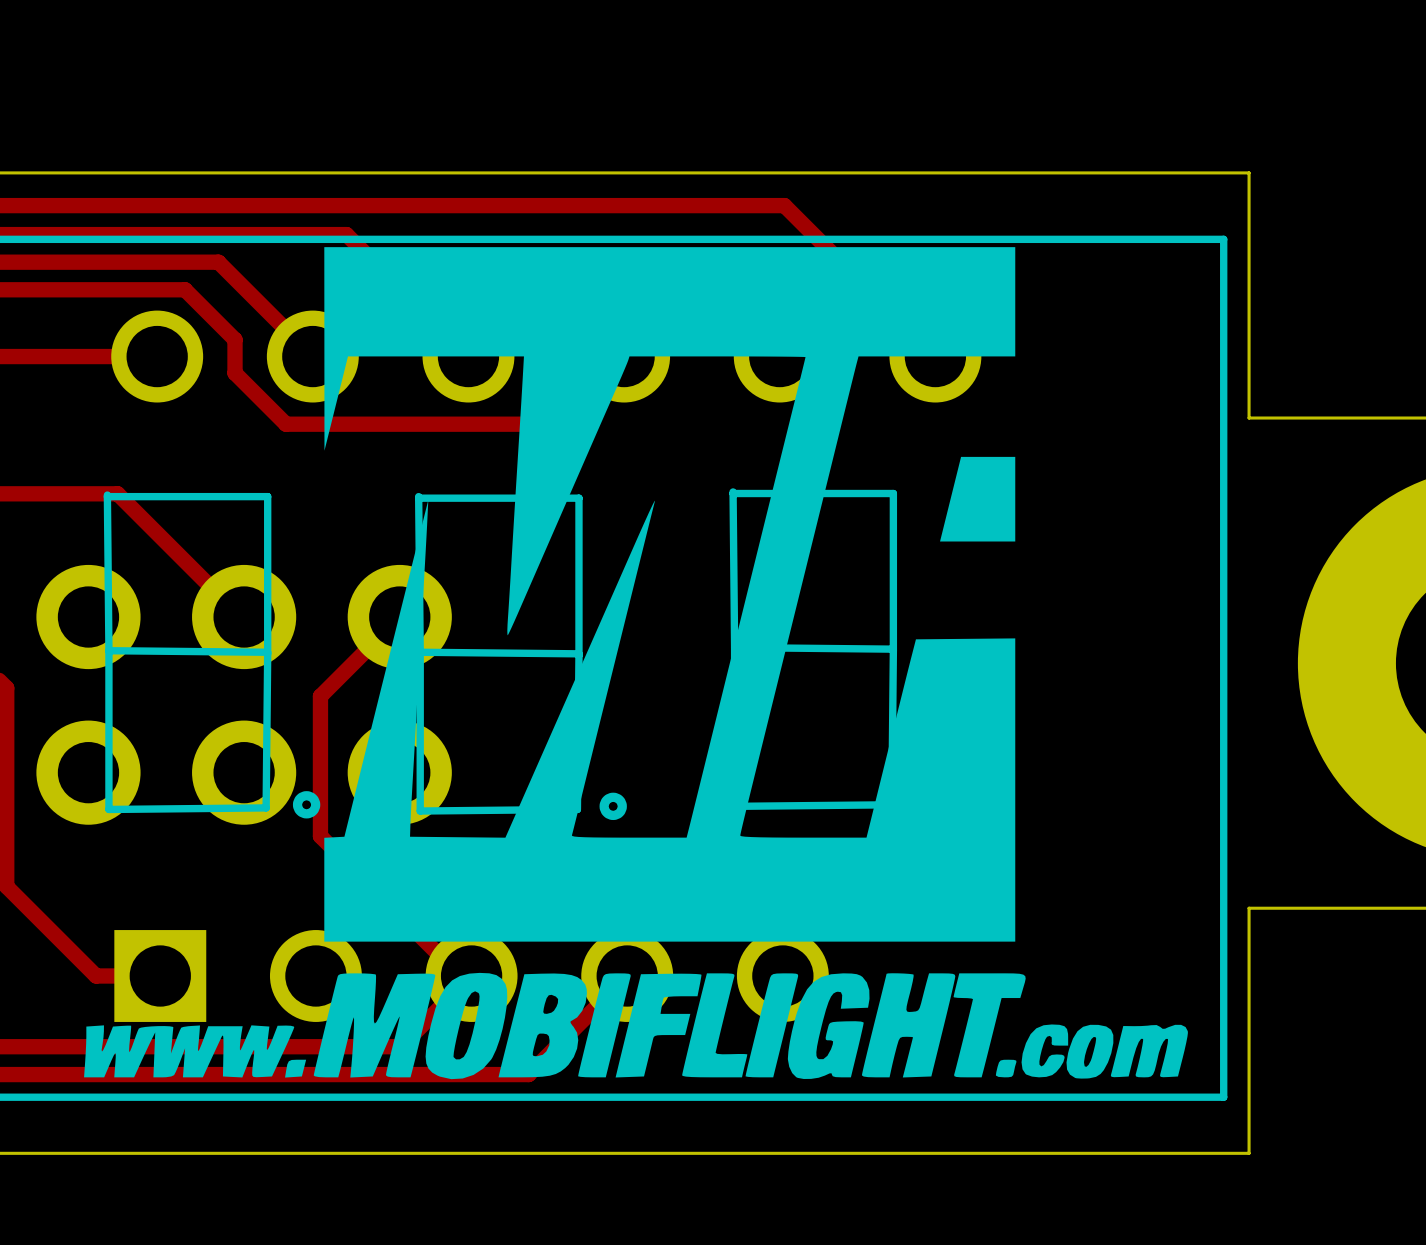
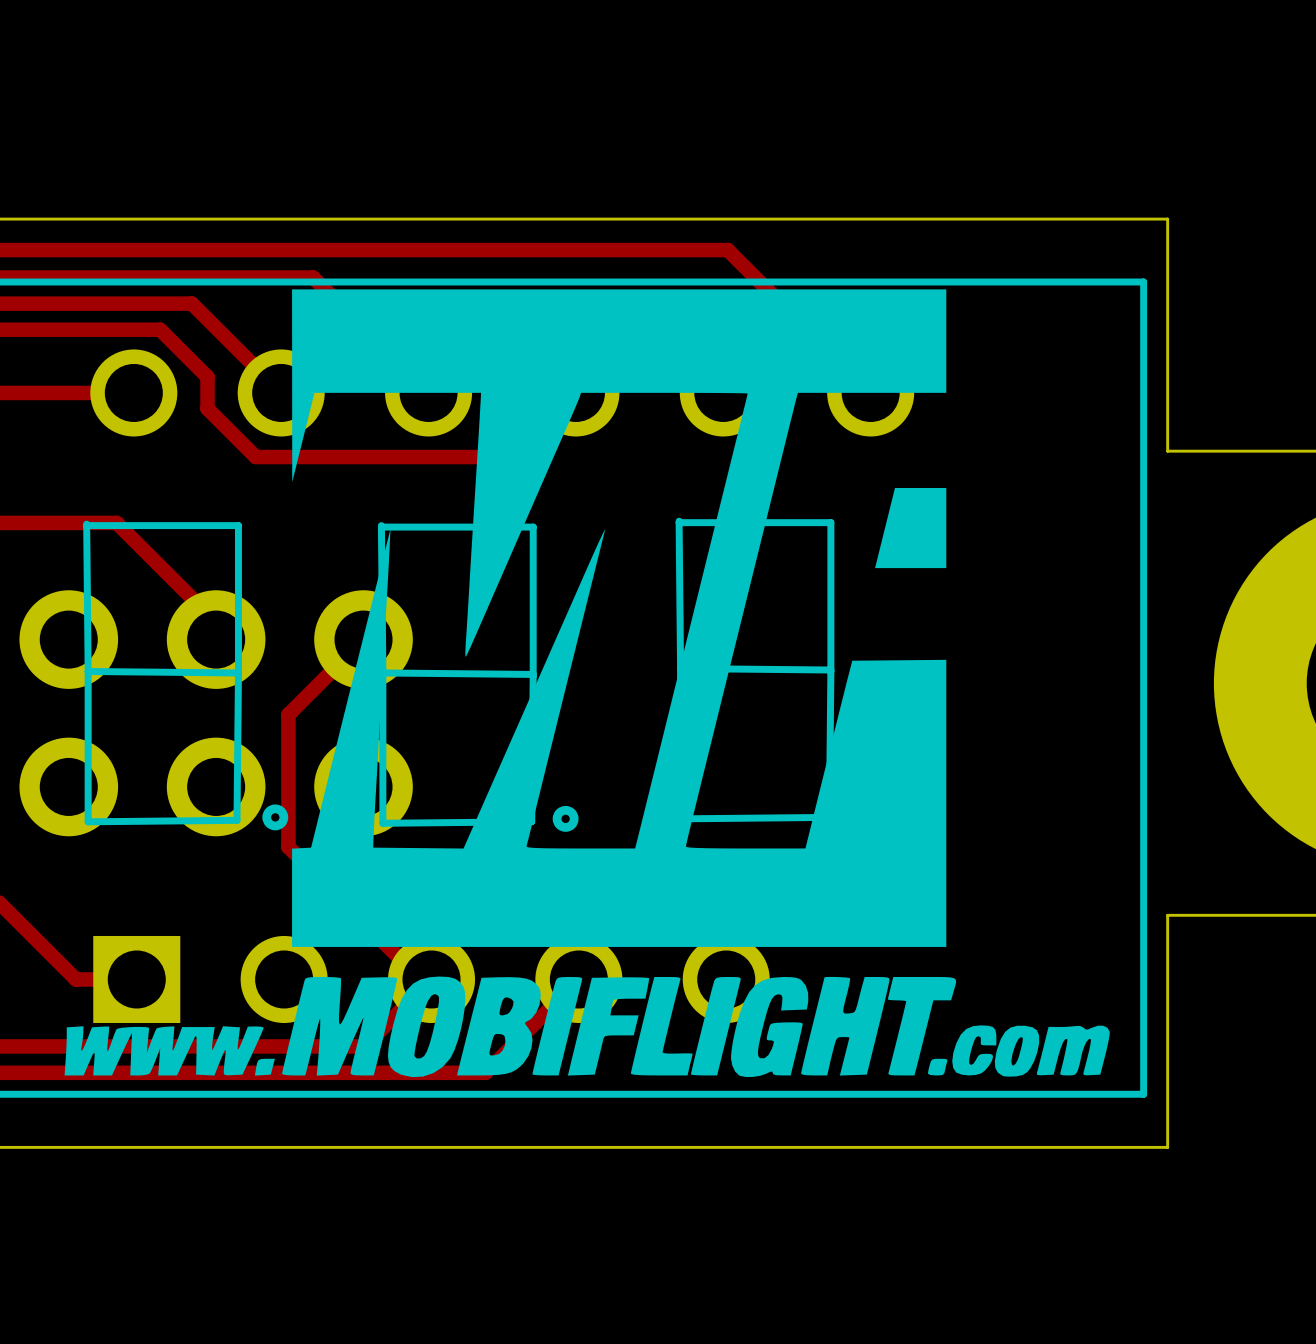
track: (117, 493) (240, 617) (244, 617) -> (96, 522) (116, 522) (216, 620)

